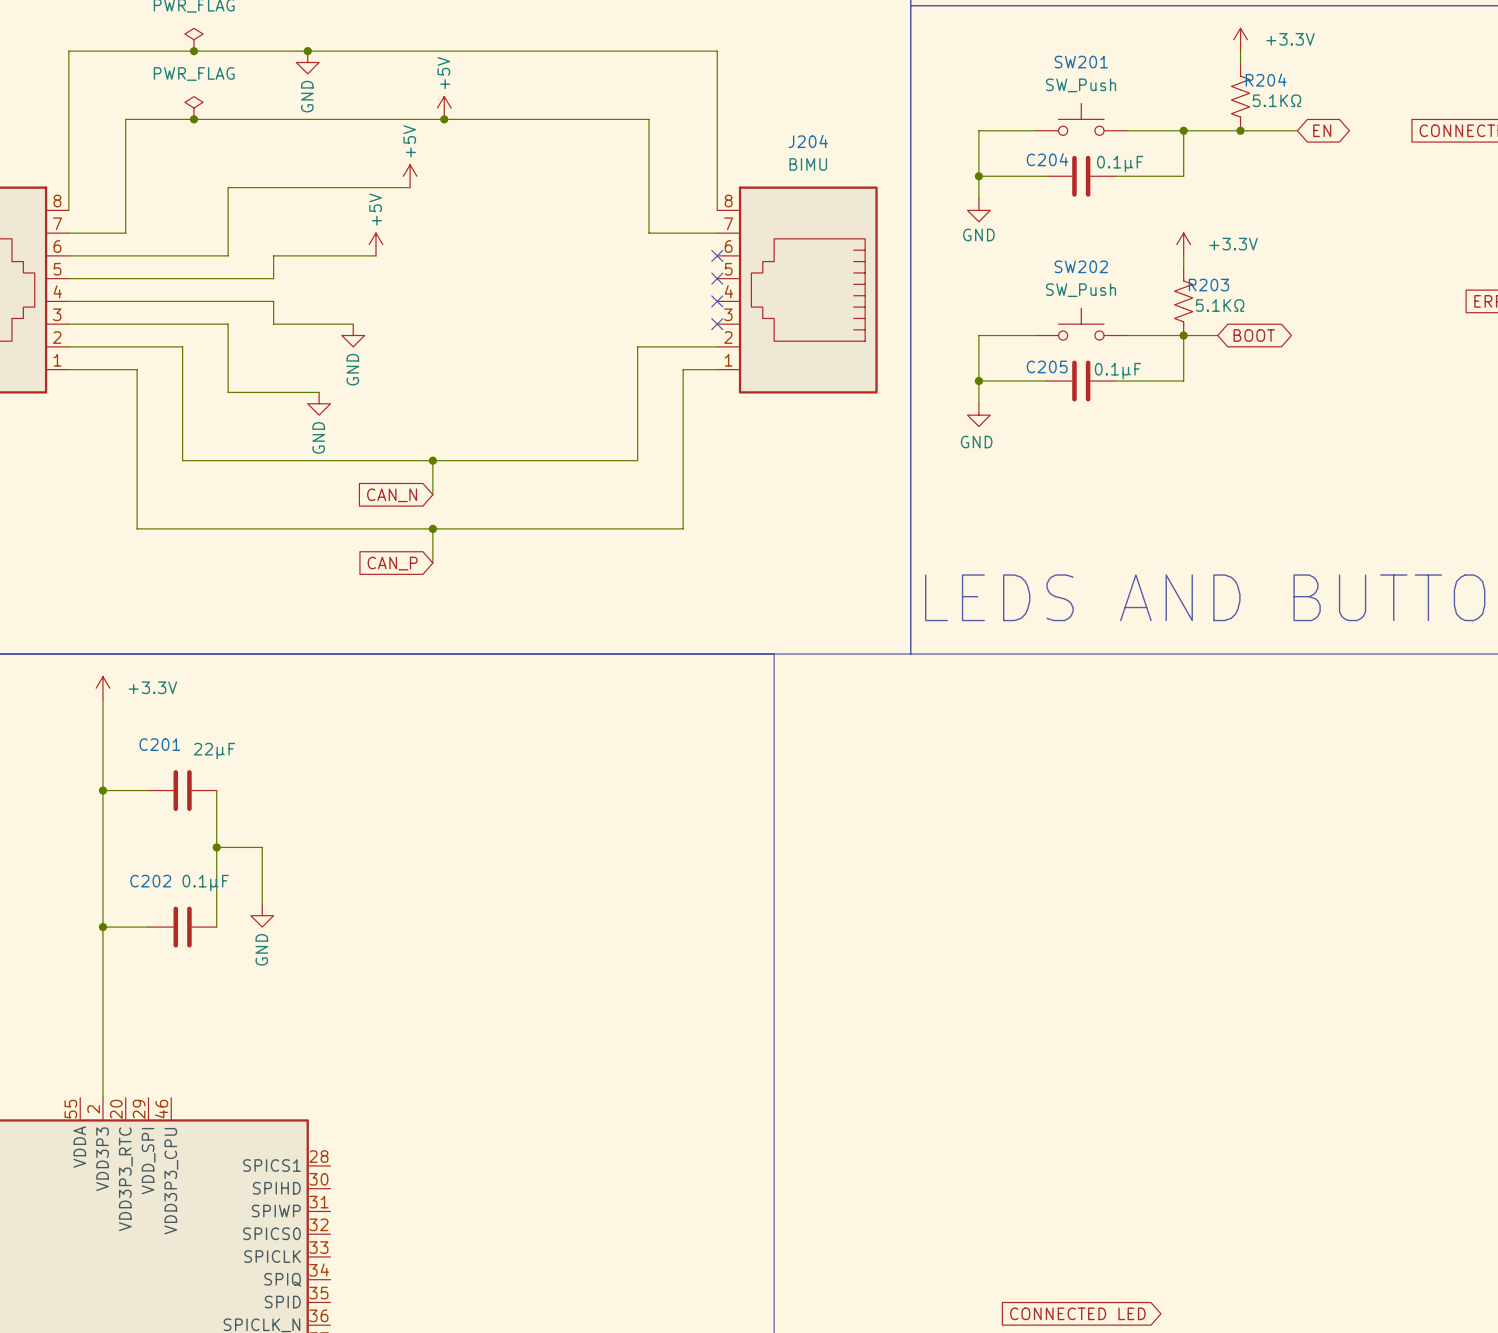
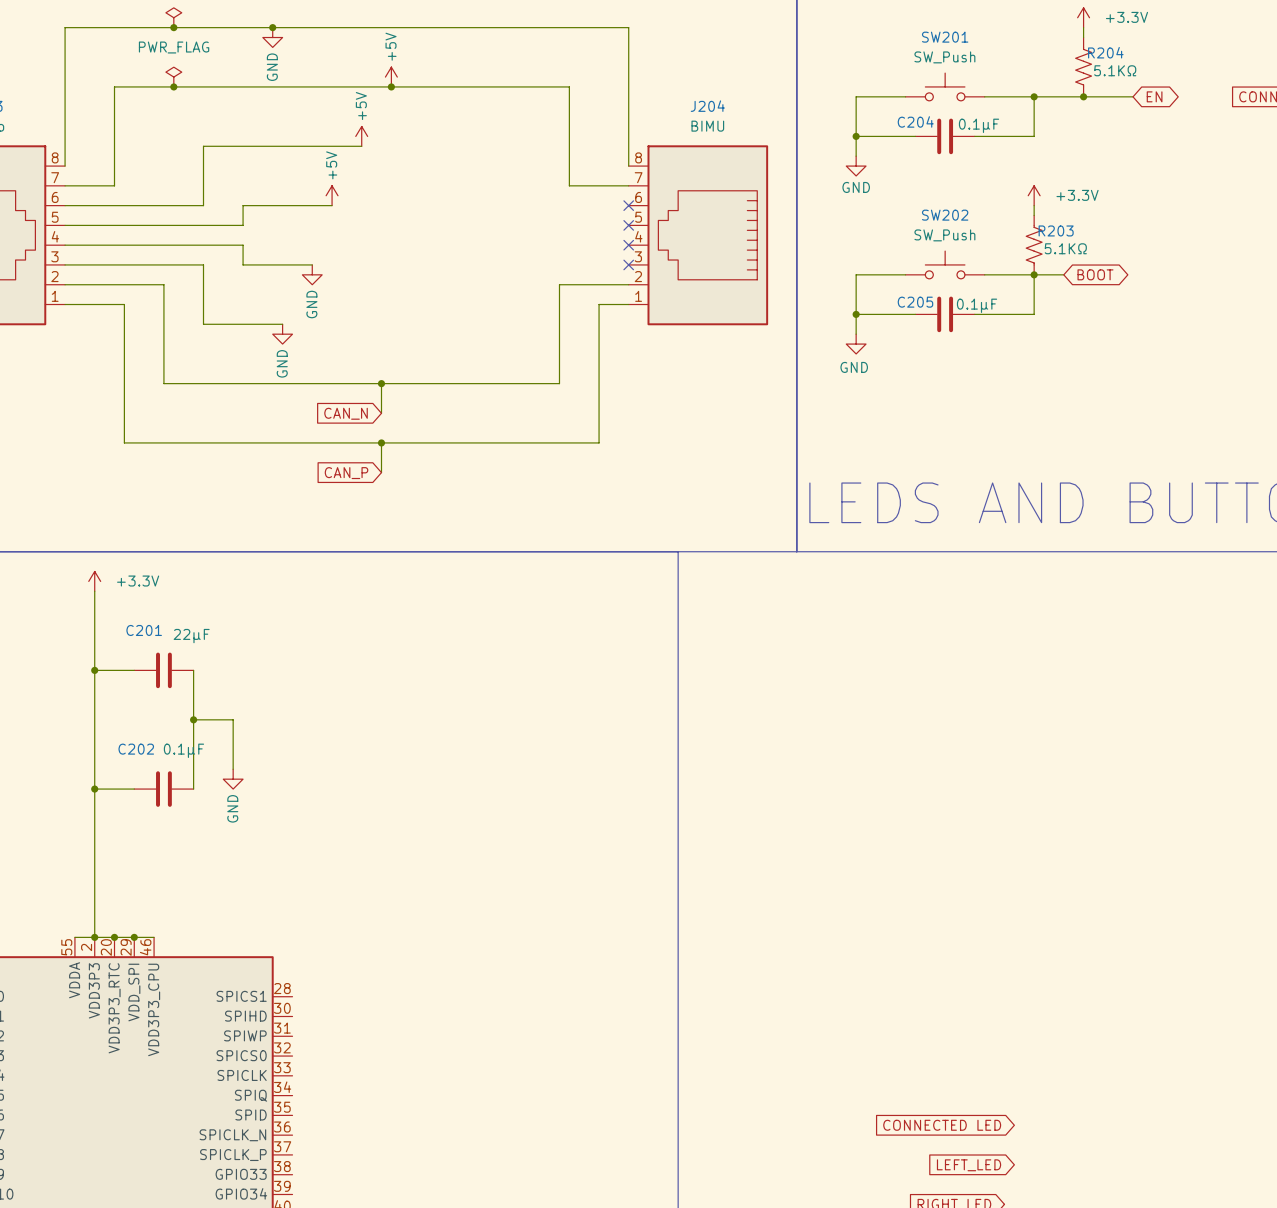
wire: none -> (74, 937) (154, 937)
junction: none -> (94, 937)
junction: none -> (114, 937)
junction: none -> (134, 937)

